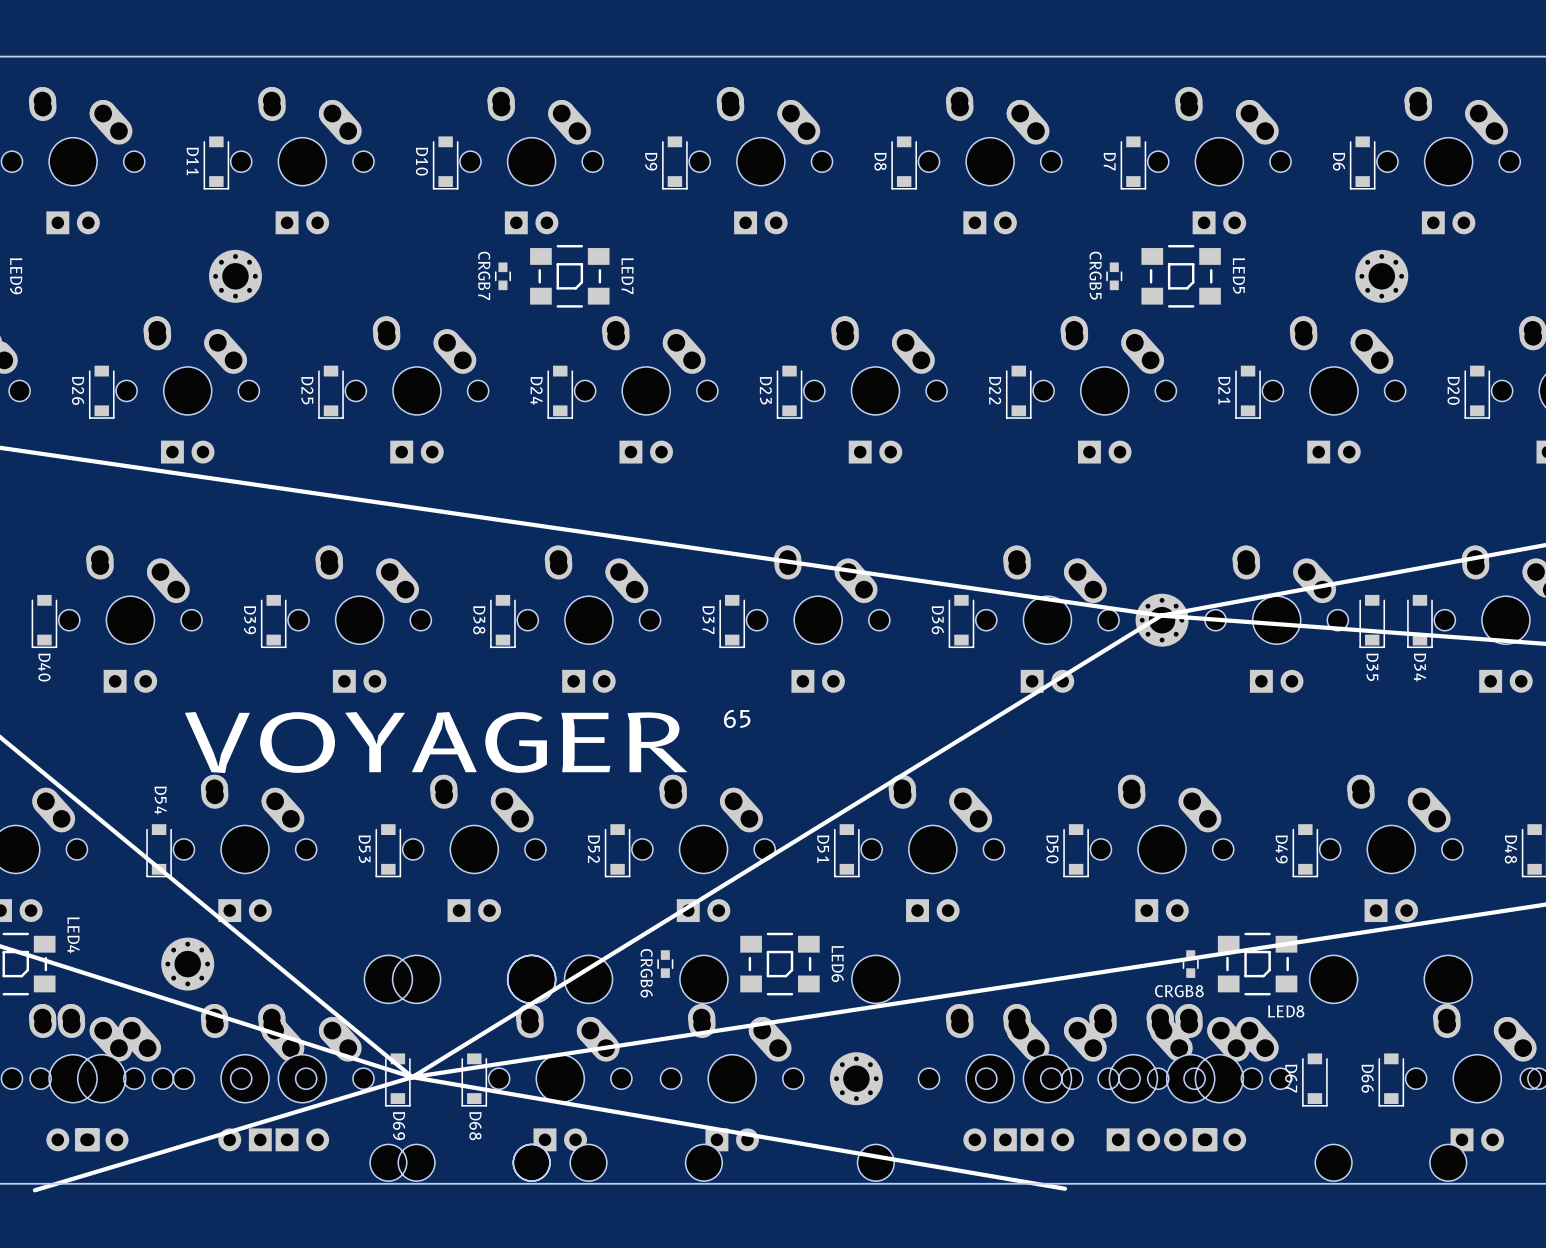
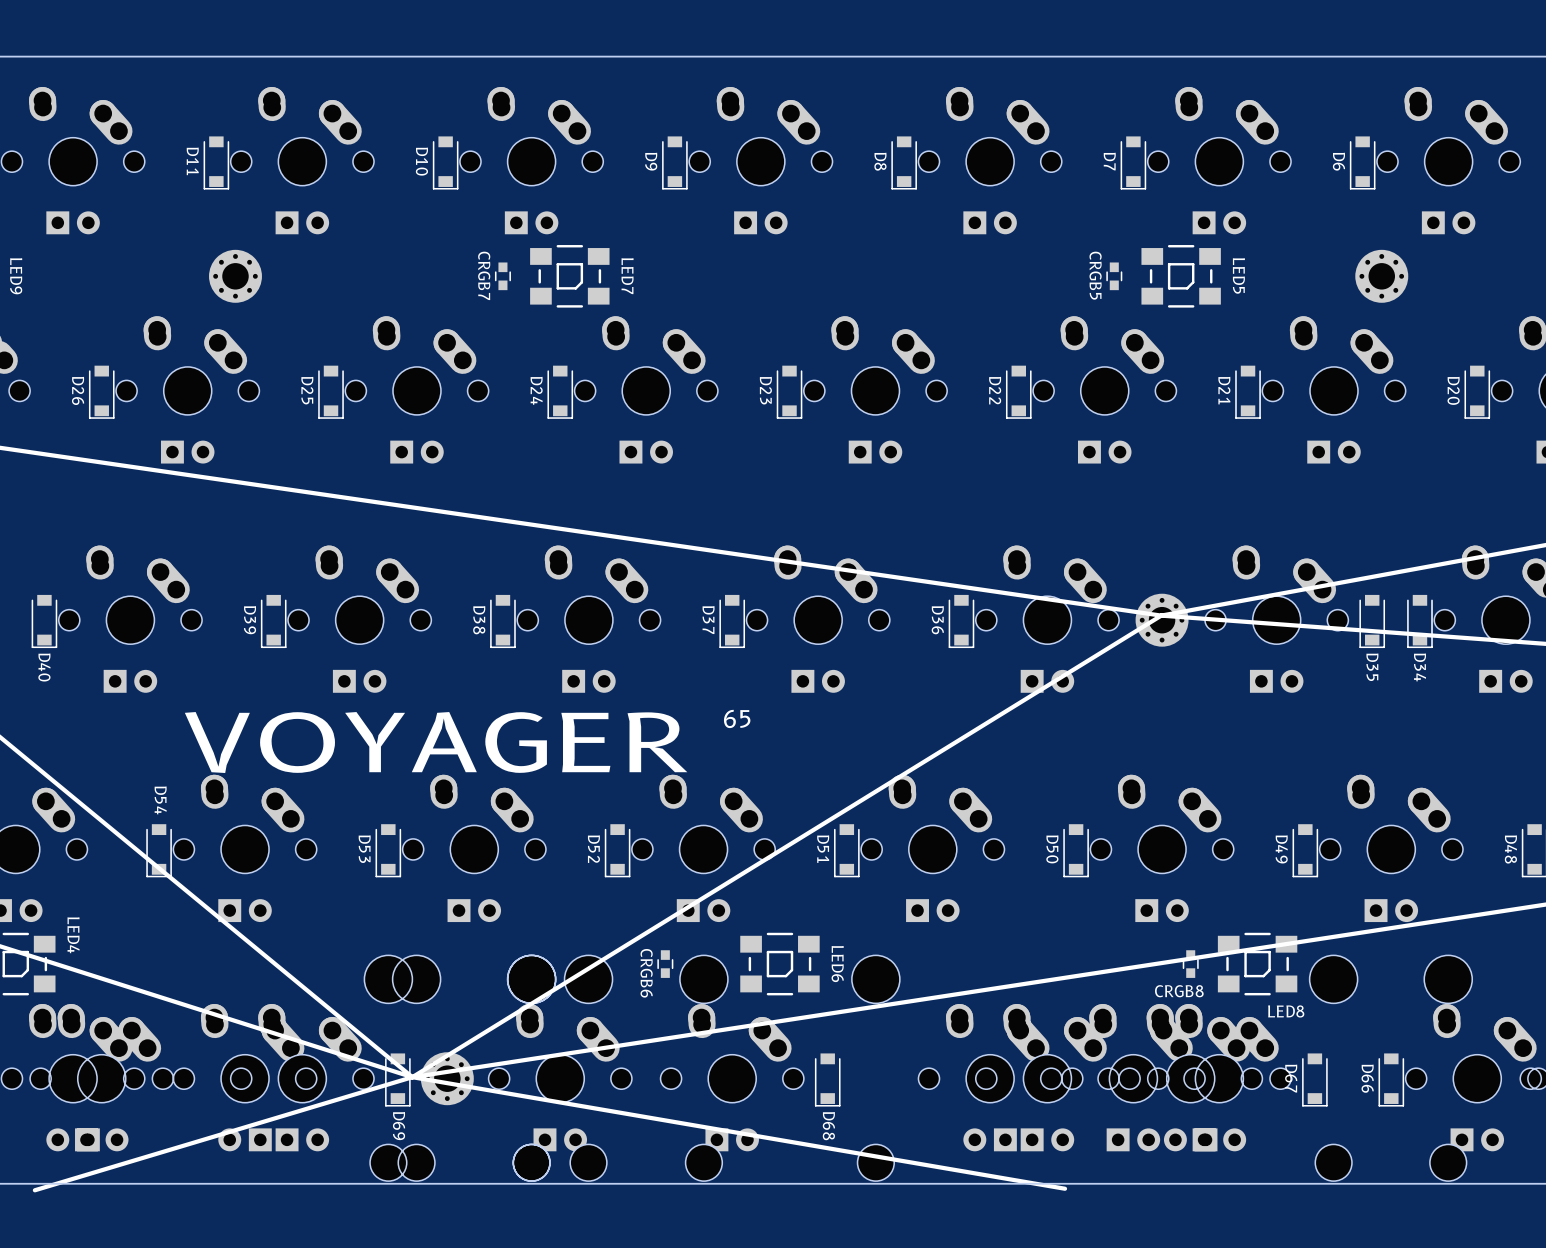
part: (187, 964) -> none
part: none -> (447, 1078)
part: (856, 1078) -> none
D68 position: (474, 1079) -> (827, 1079)

